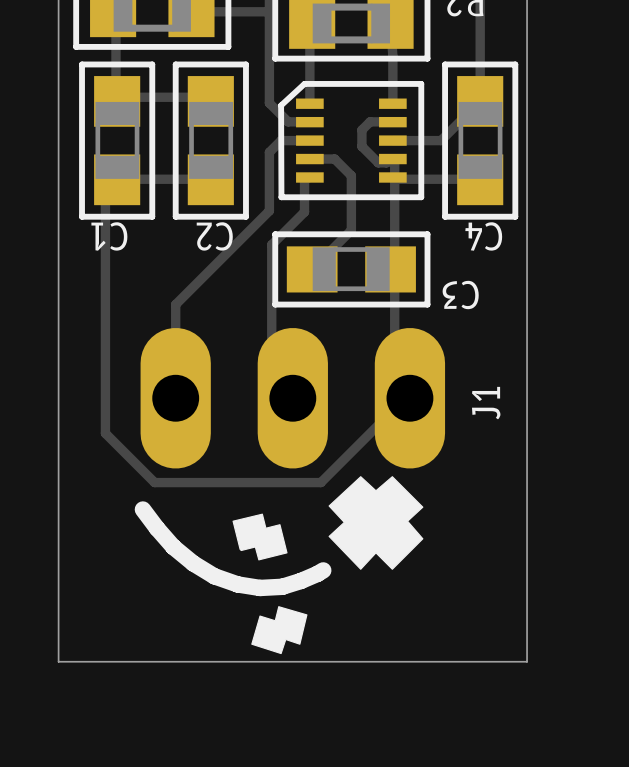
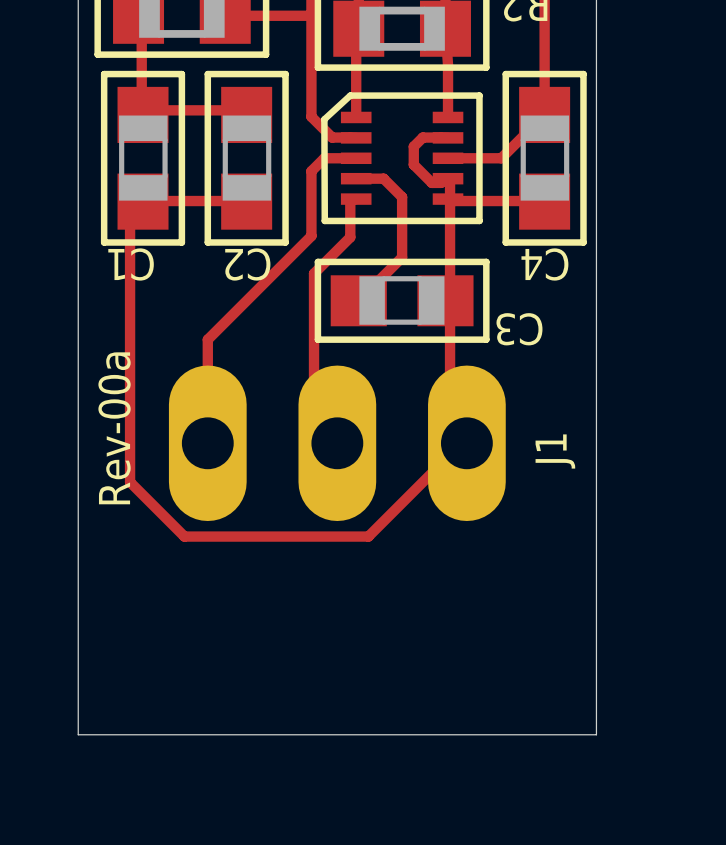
text: none -> Rev-00a (114, 428)
drawing: [232, 476, 424, 655] -> none
line: (142, 509) (173, 546) (193, 563) (214, 576) (237, 584) (260, 587) (282, 586) (301, 580) (323, 570) -> none

